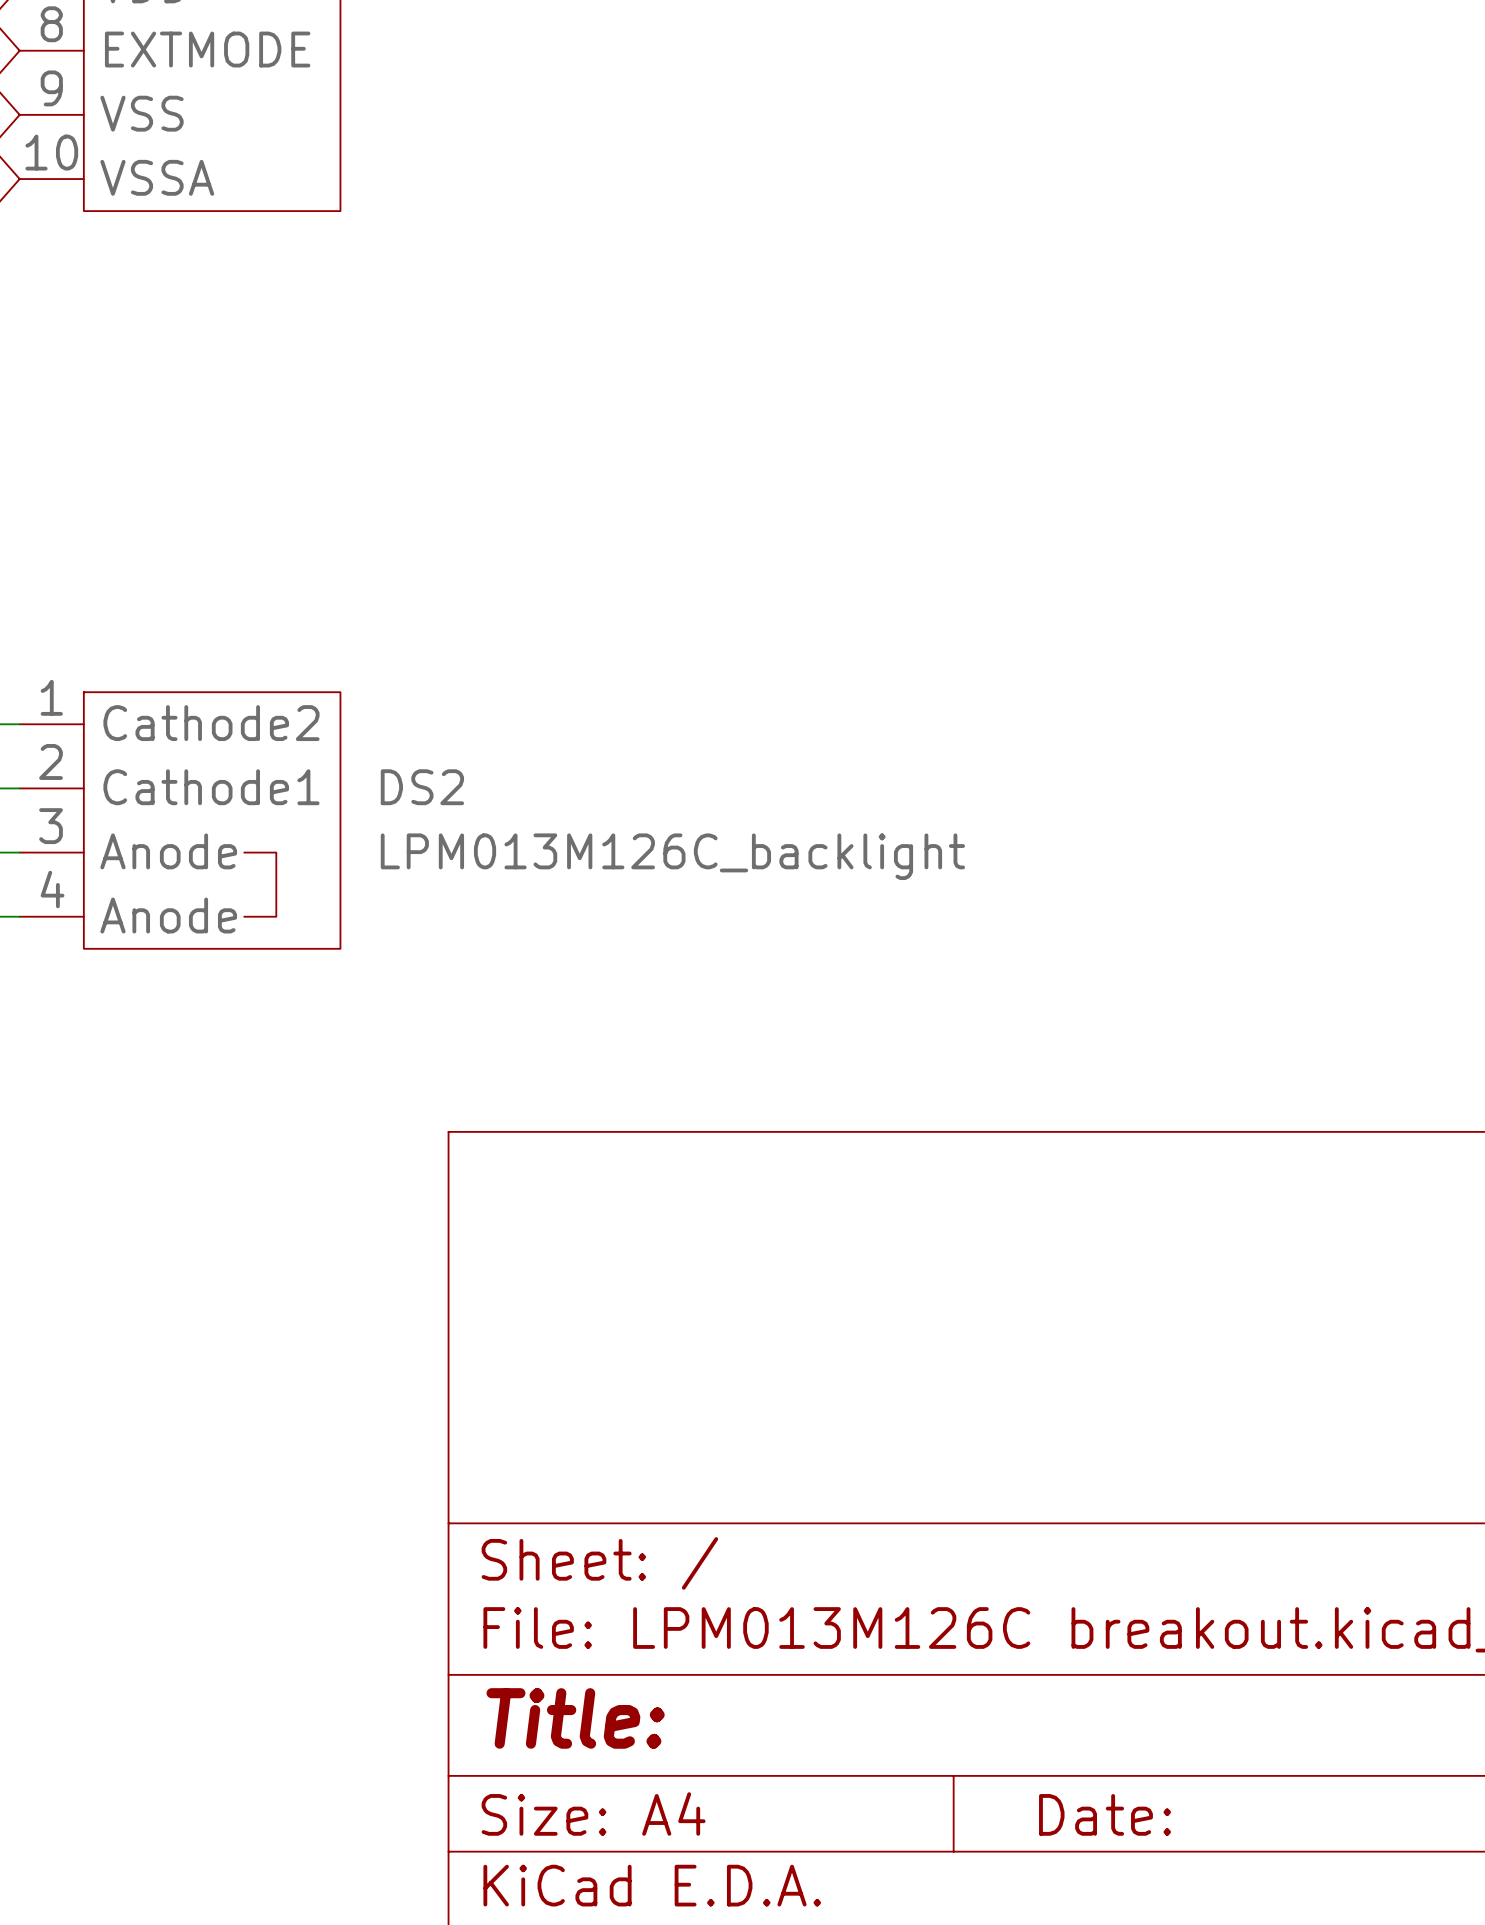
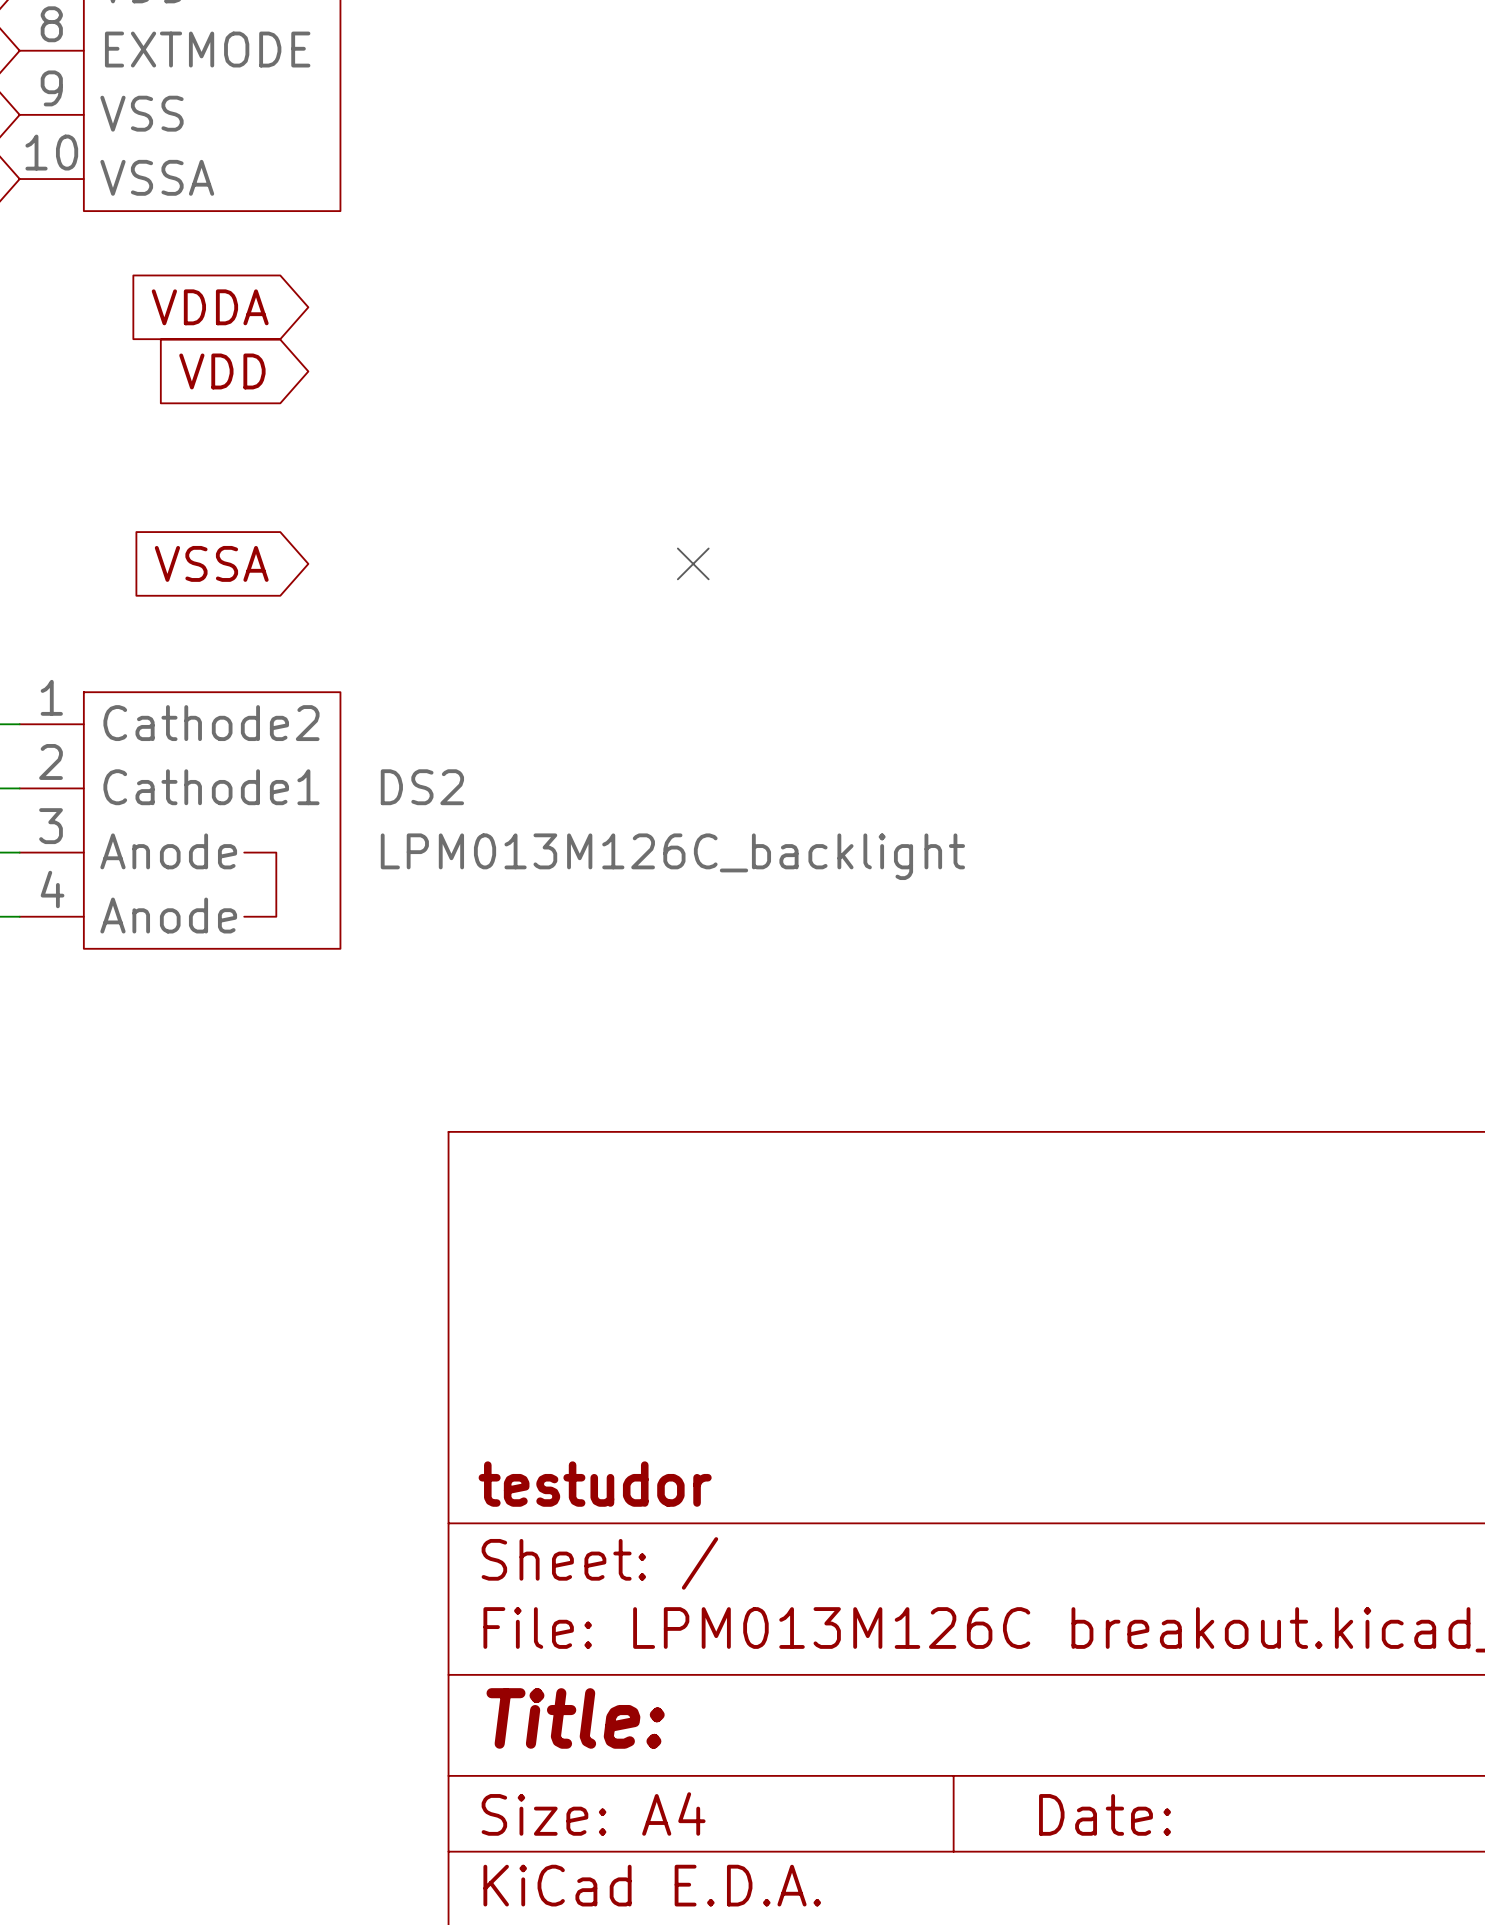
global label: none -> VDDA (210, 307)
global label: none -> VDD (222, 371)
global label: none -> VSSA (211, 563)
no-connect mark: none -> (693, 563)
title block: none -> testudor (595, 1484)

